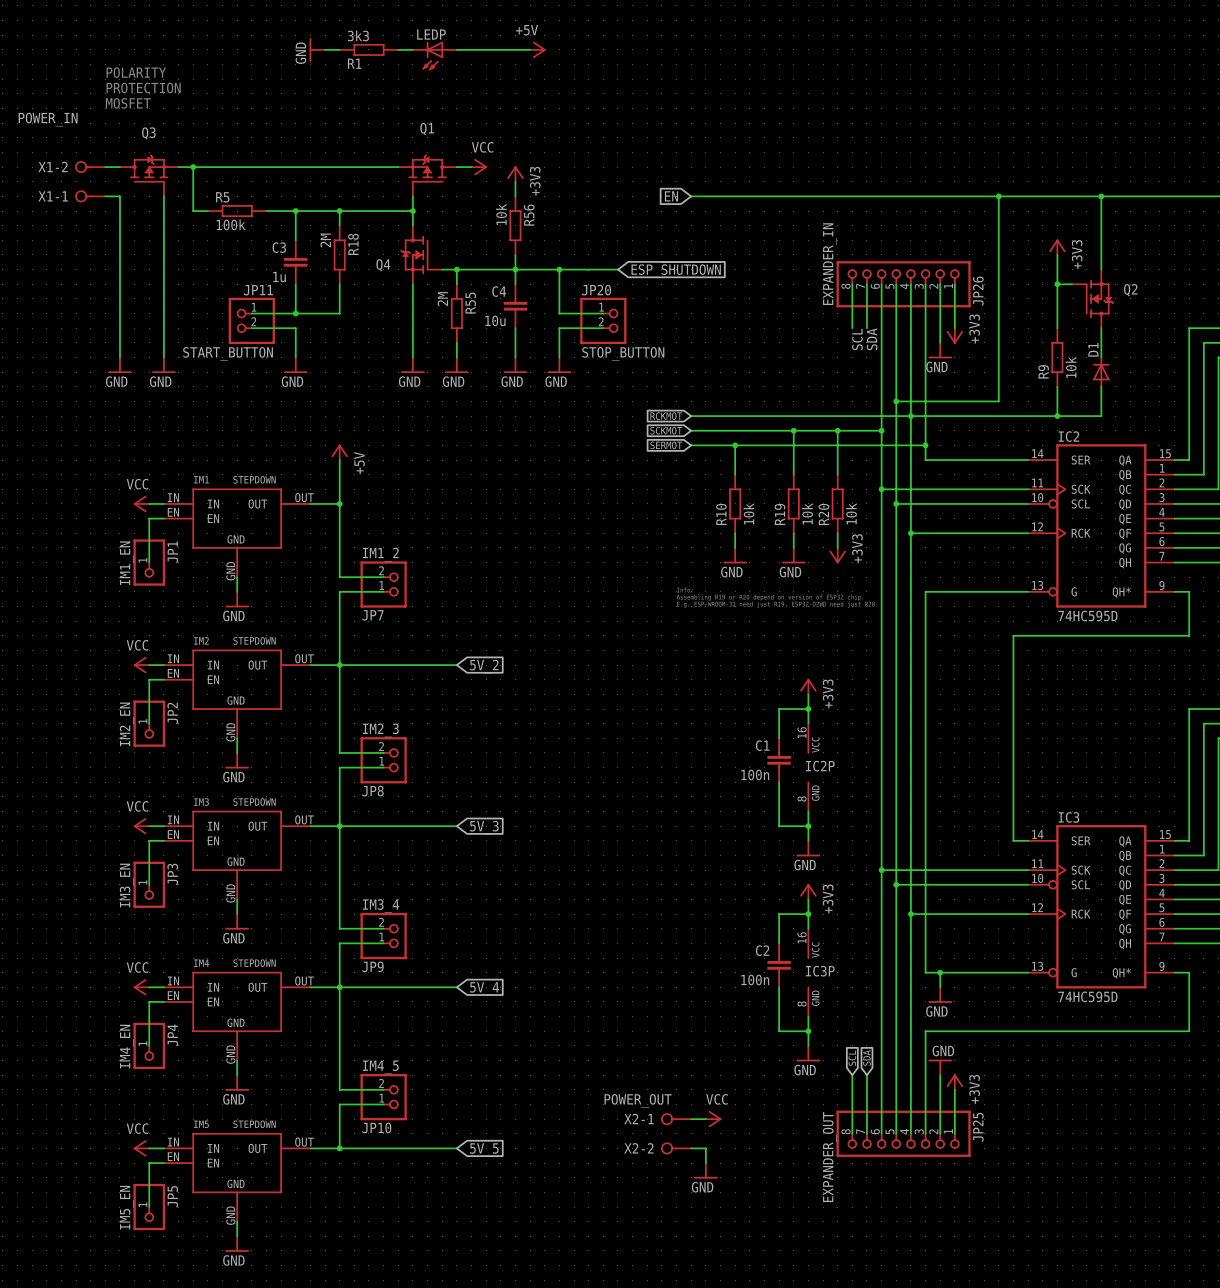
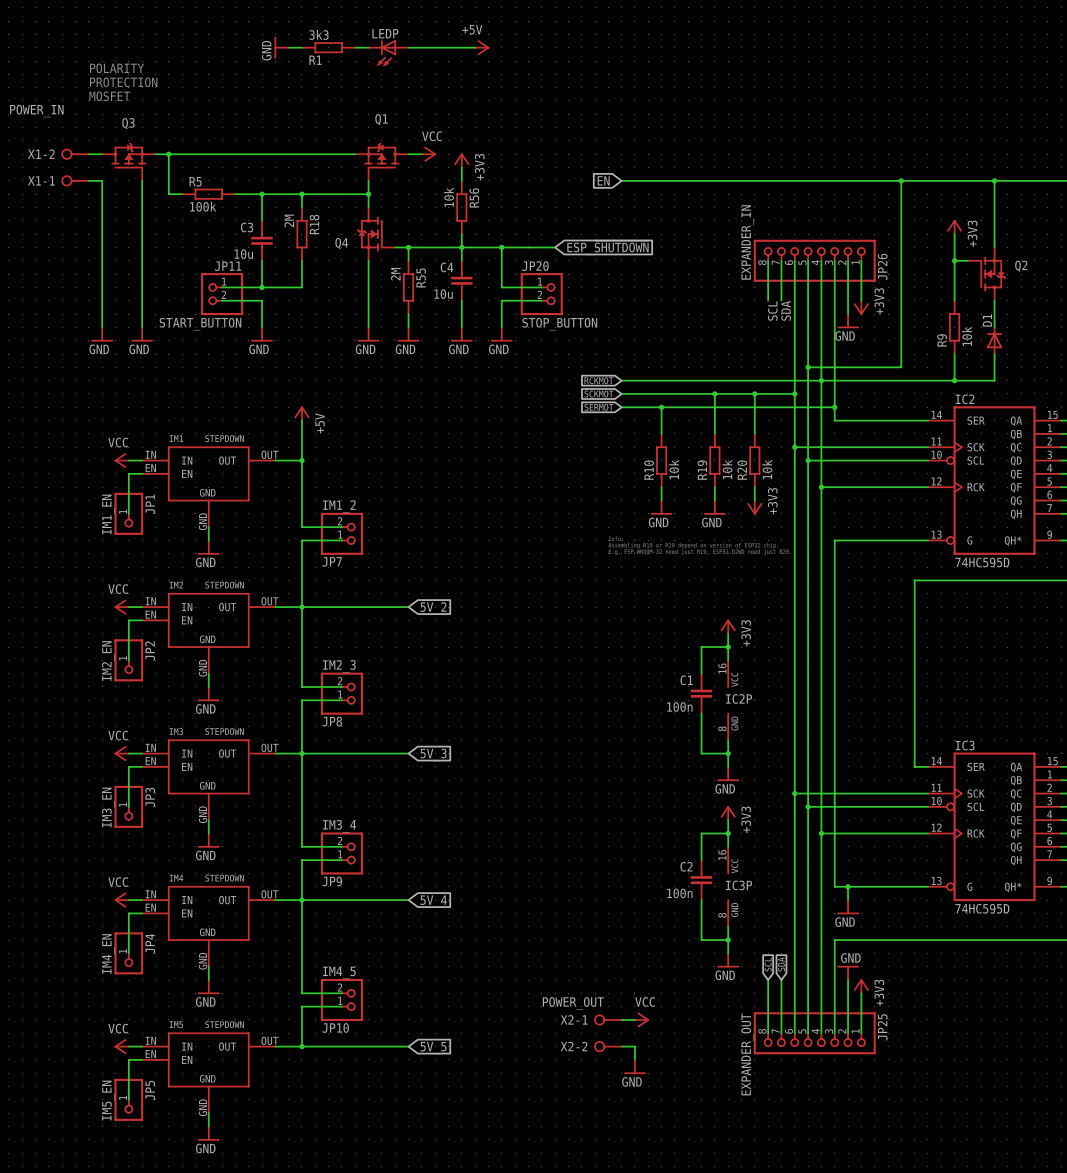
C3 value: 1u (279, 277) -> 10u (243, 254)

